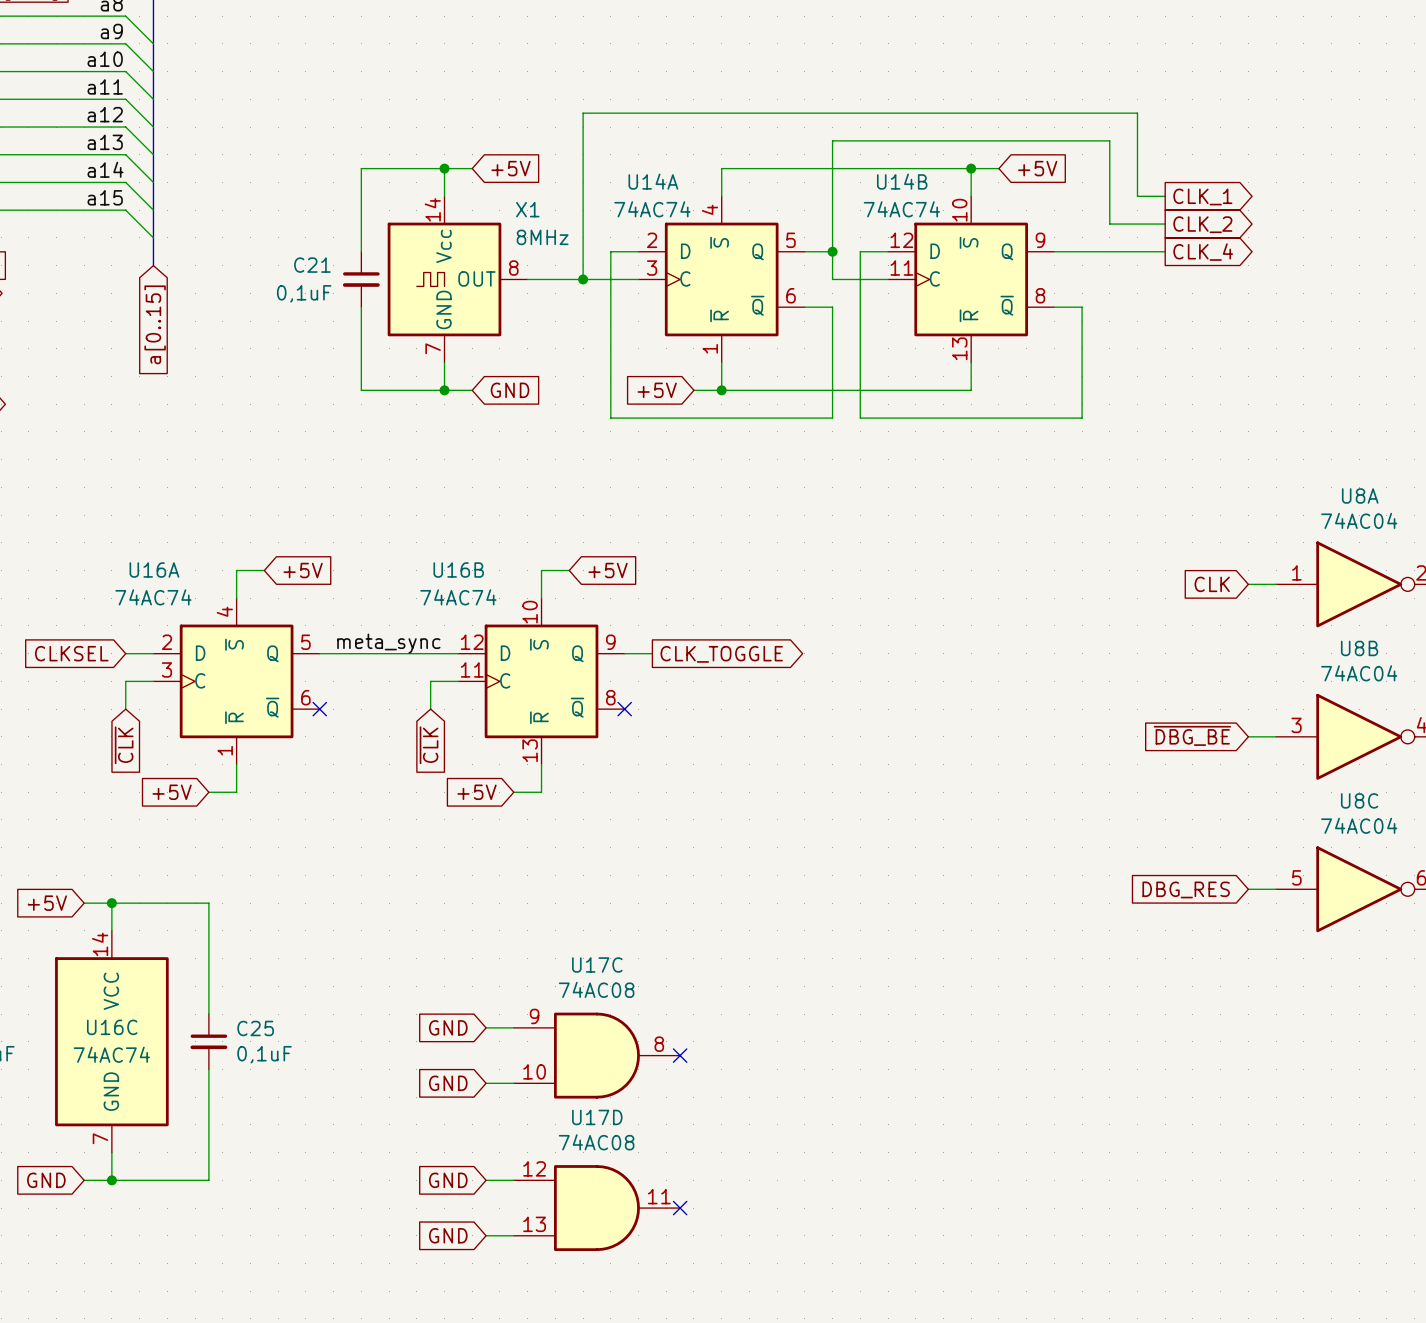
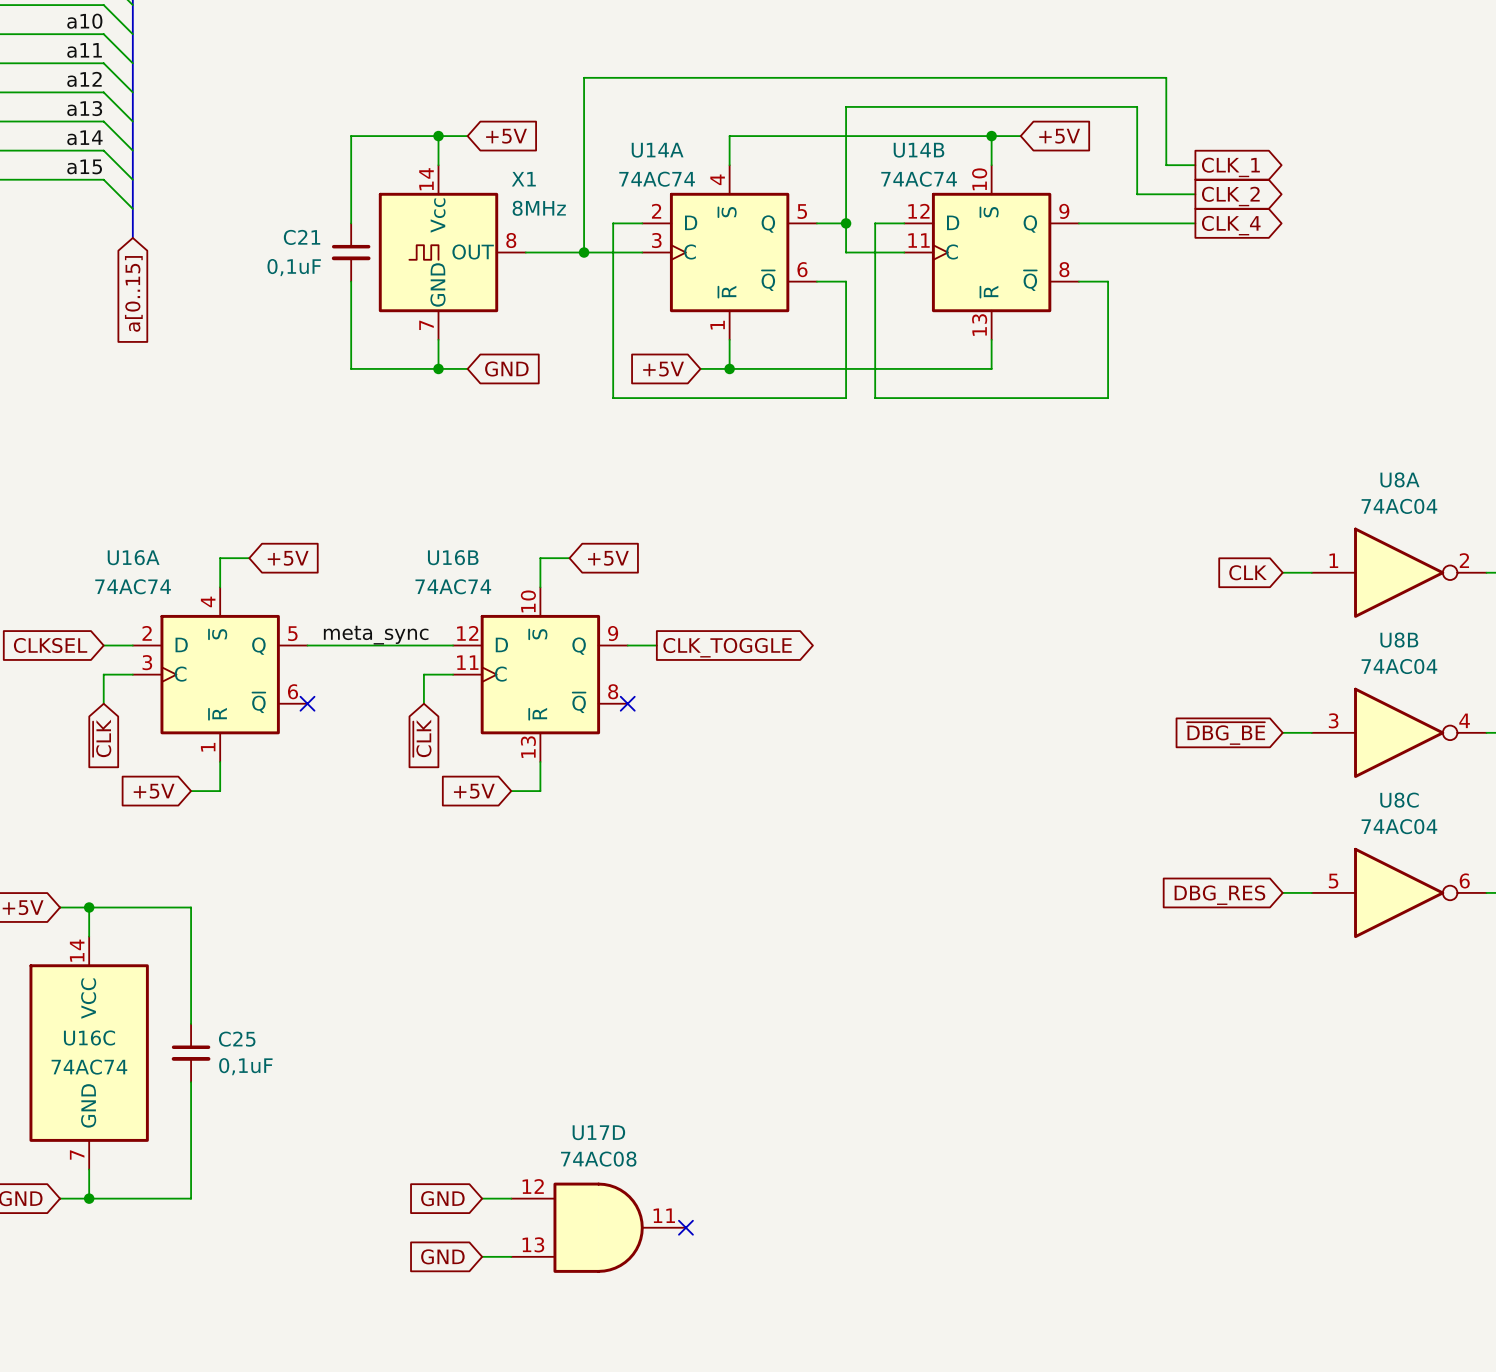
global label: GND (448, 1027) -> none
wire: (486, 1027) (513, 1027) -> none
U17C: 74AC08 (596, 1055) -> none
no-connect mark: (680, 1055) -> none
global label: GND (448, 1083) -> none
wire: (486, 1083) (513, 1083) -> none

